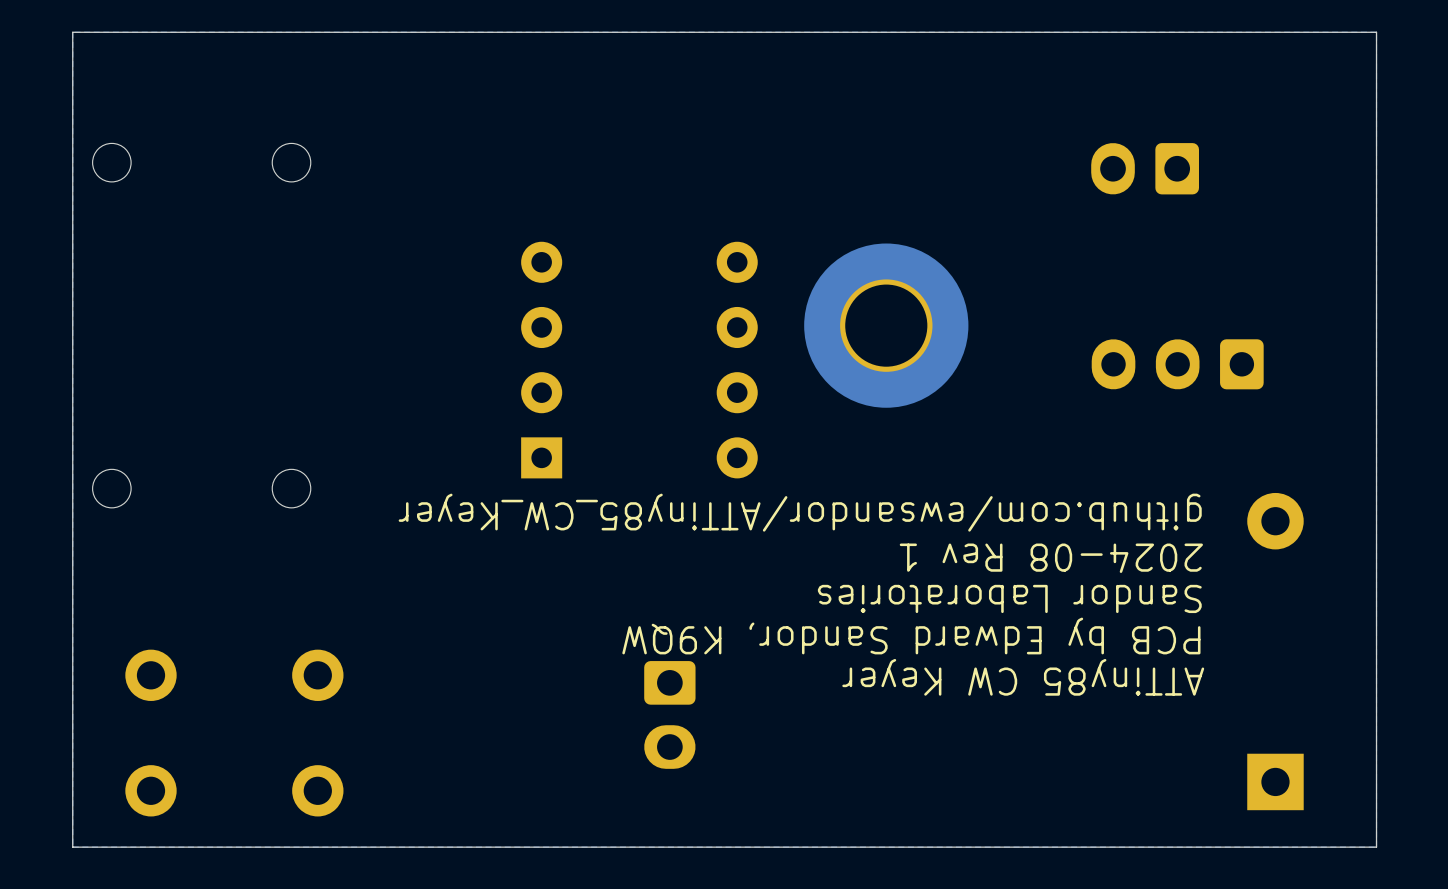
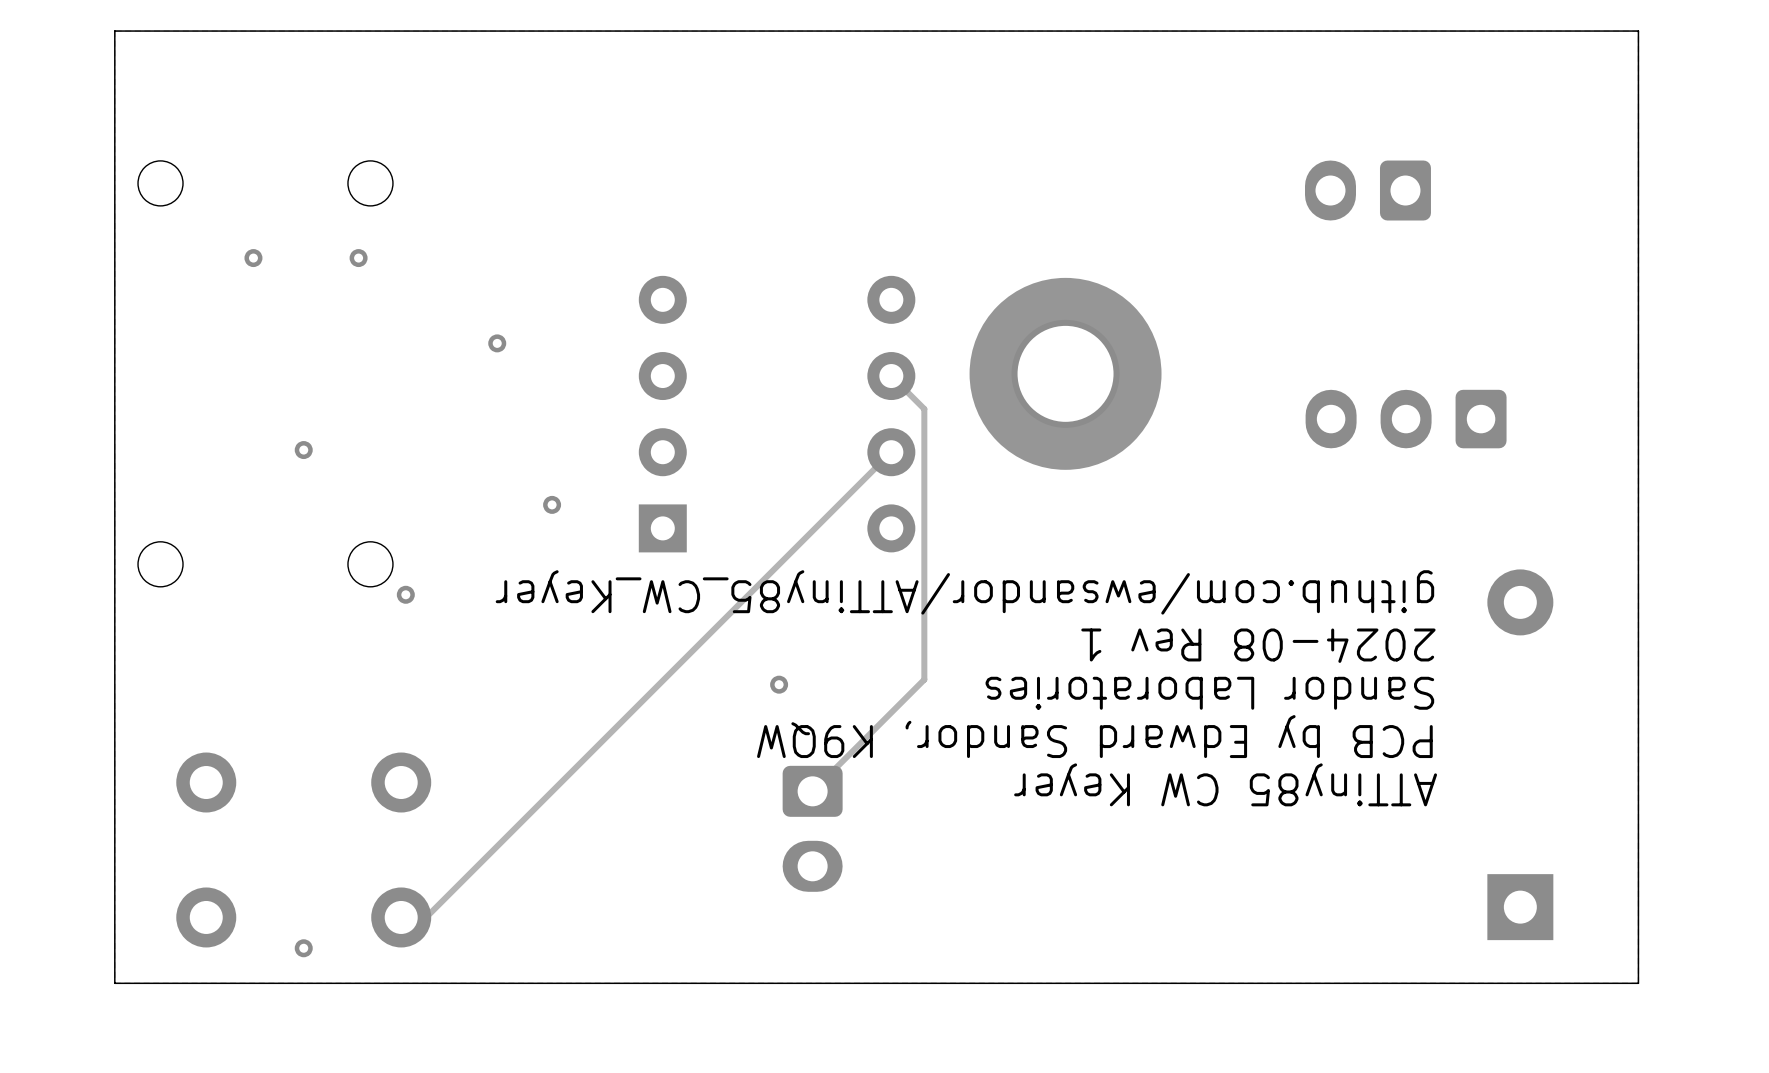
via: none -> (253, 258)
via: none -> (358, 258)
via: none -> (497, 343)
track: none -> (891, 376) (924, 409) (924, 679) (812, 791)
via: none -> (303, 450)
track: none -> (891, 452) (426, 917) (401, 917)
via: none -> (552, 504)
via: none -> (405, 594)
via: none -> (779, 684)
via: none -> (303, 948)

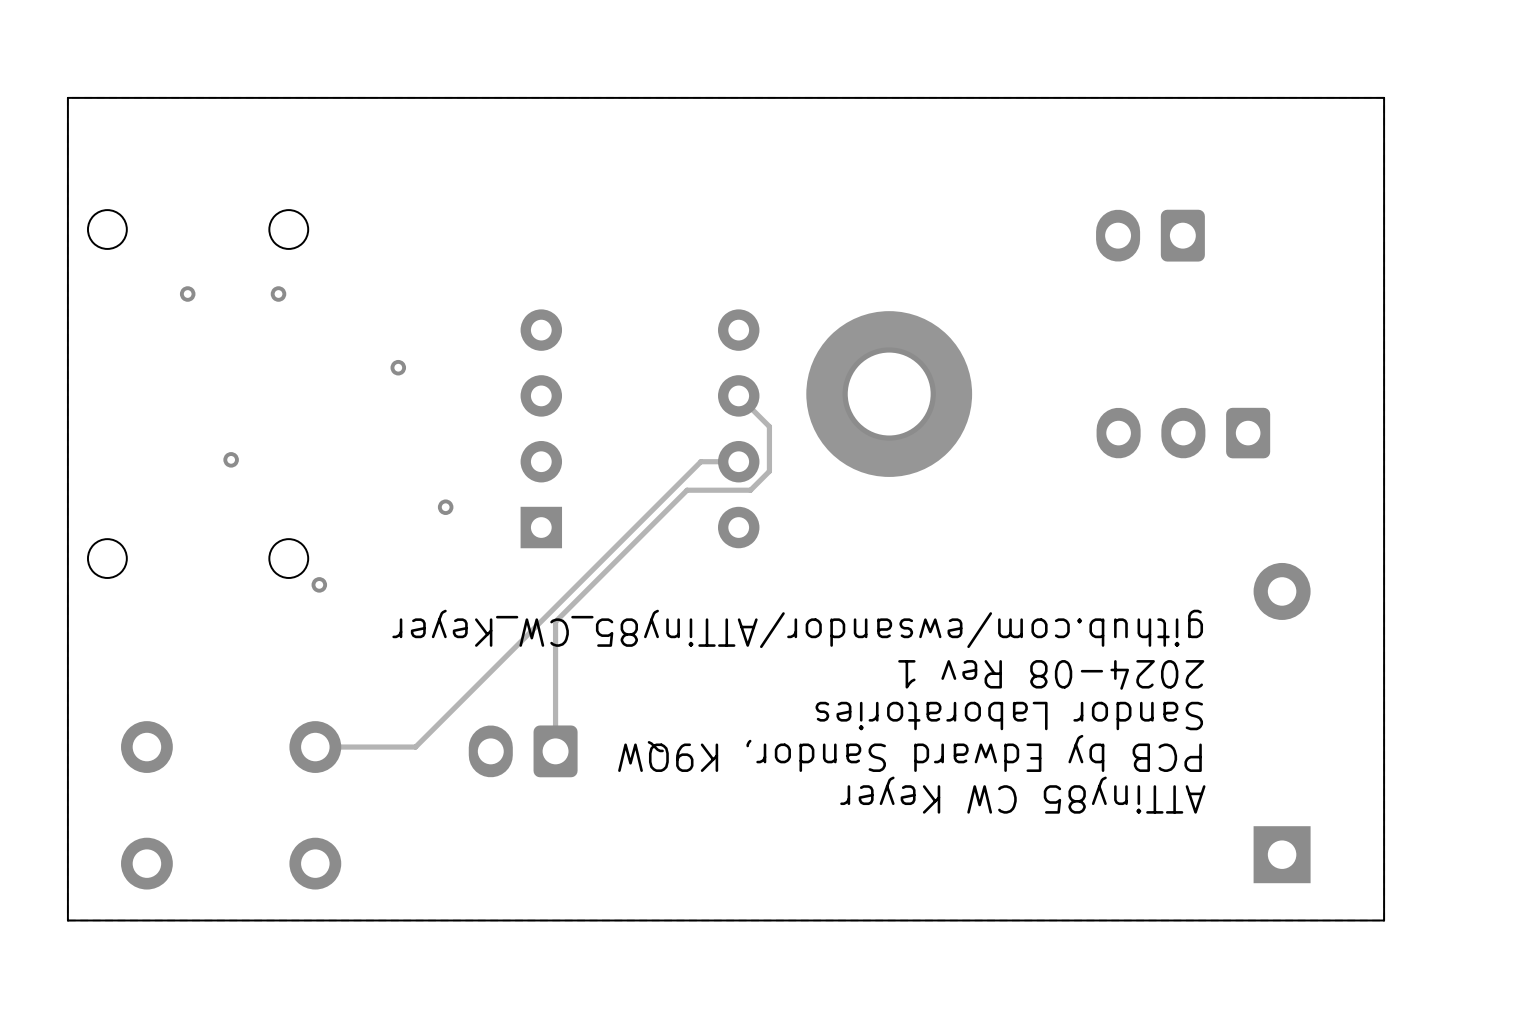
track: (924, 409) (924, 679) (812, 791) -> (767, 424) (769, 426) (769, 471) (750, 490) (687, 490) (555, 621) (555, 751)
track: (891, 452) (426, 917) -> (738, 461) (700, 461) (415, 747) (315, 747)
text: github.com/ewsandor/ATTiny85_CW_Keyer (964, 592) -> none
text: 2024-08 Rev 1 (1258, 645) -> github.com/ewsandor/ATTiny85_CW_Keyer (797, 628)
via: (779, 684) -> none
text: Sandor Laboratories (1209, 693) -> 2024-08 Rev 1 (1051, 674)
text: PCB by Edward Sandor, K9QW (1094, 736) -> Sandor Laboratories (1009, 716)
text: ATTiny85 CW Keyer (1225, 784) -> PCB by Edward Sandor, K9QW (909, 753)
part rotation: 0° (812, 828) -> 90° clockwise (523, 751)
part position: (812, 828) -> (523, 751)
text: none -> ATTiny85 CW Keyer (1022, 795)
via: (303, 948) -> none

